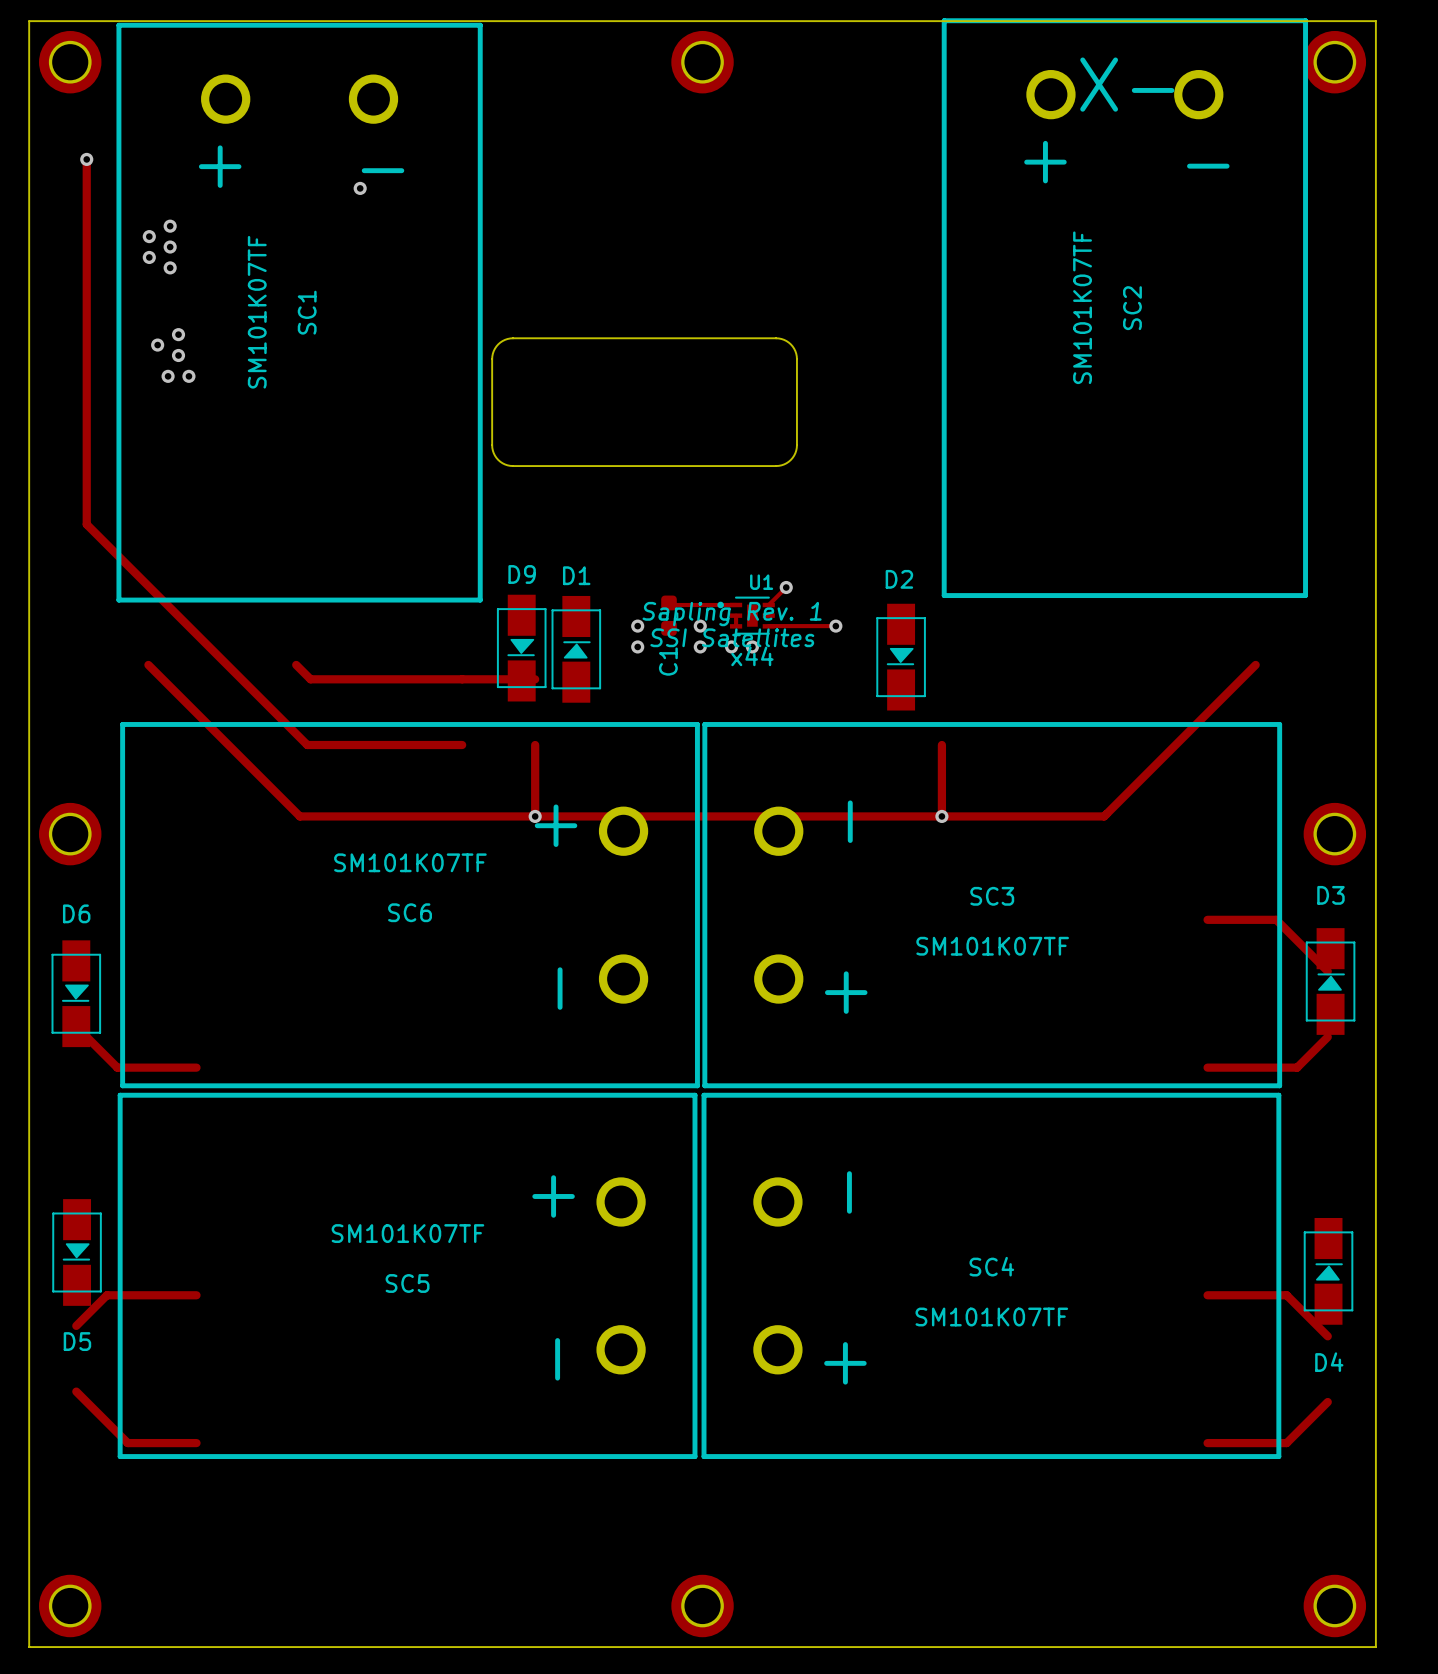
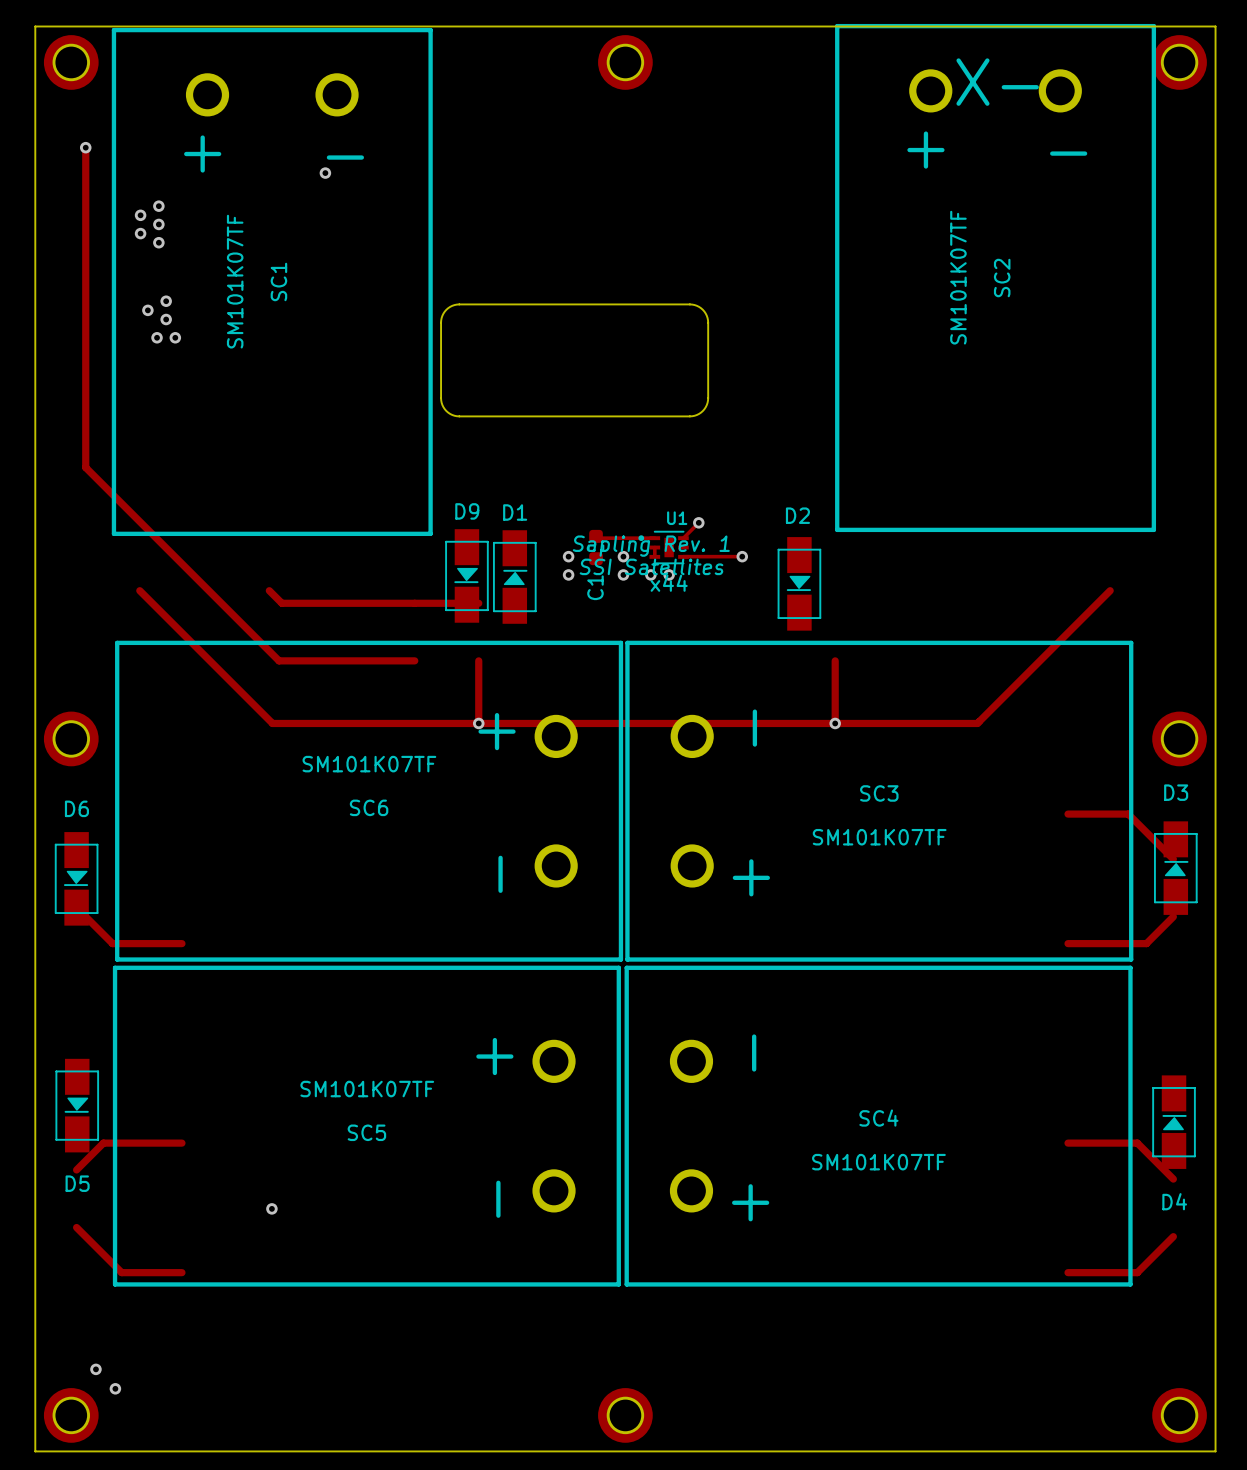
via: none -> (271, 1208)
via: none -> (95, 1369)
via: none -> (115, 1388)

